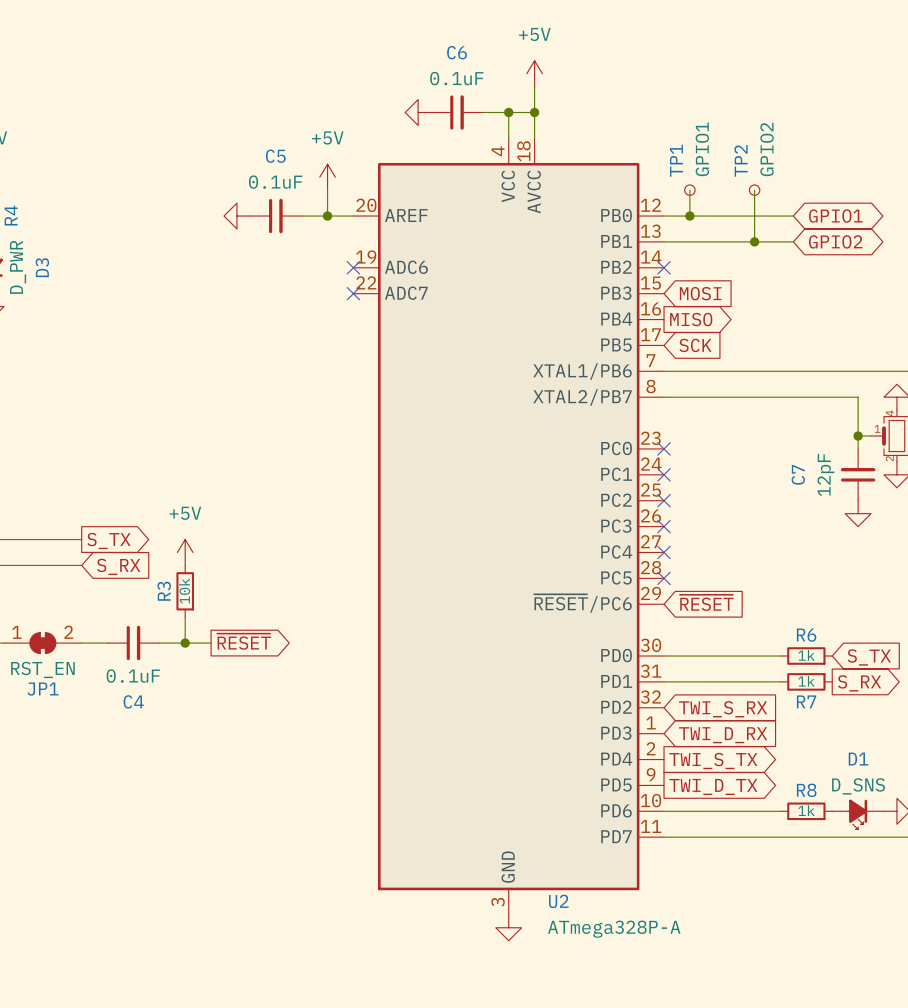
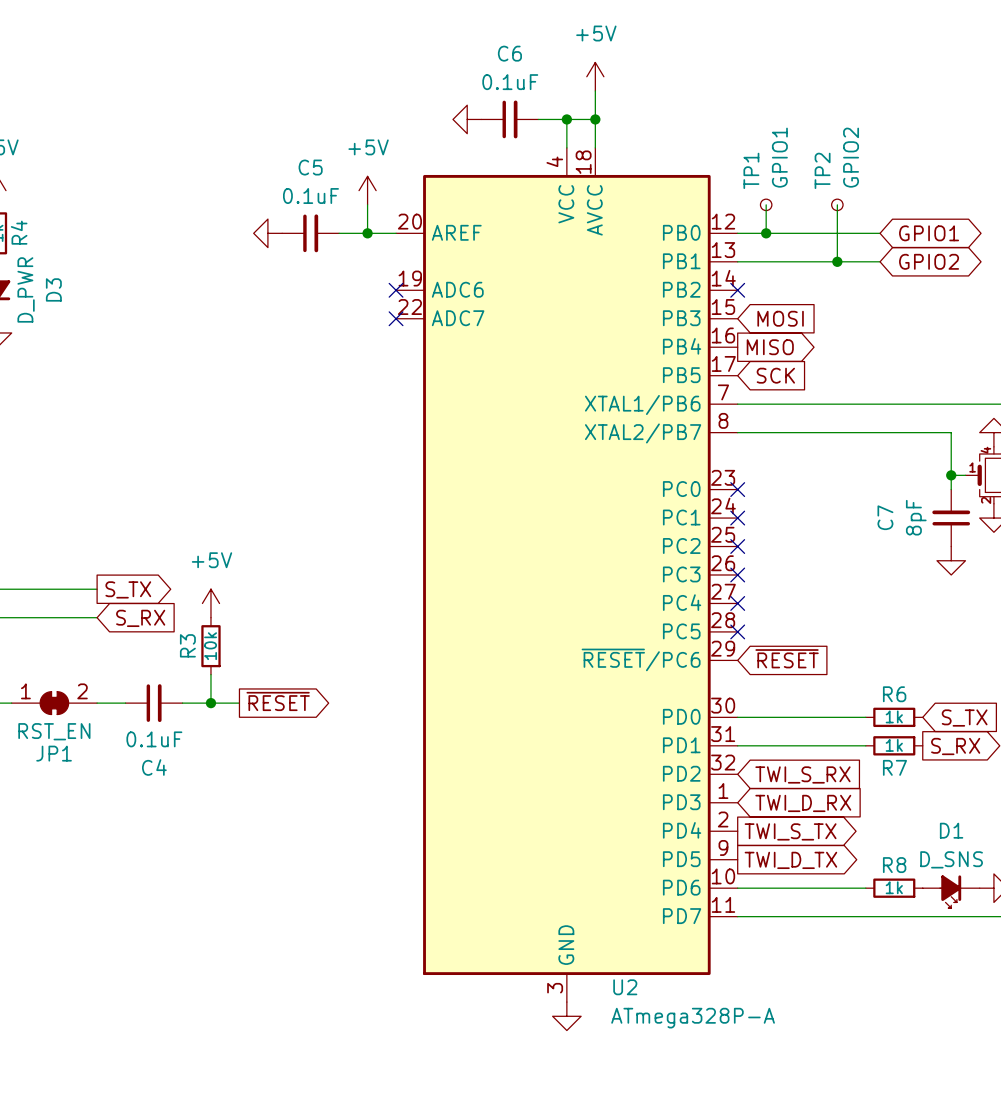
C7 value: 12pF (825, 475) -> 8pF (916, 517)

